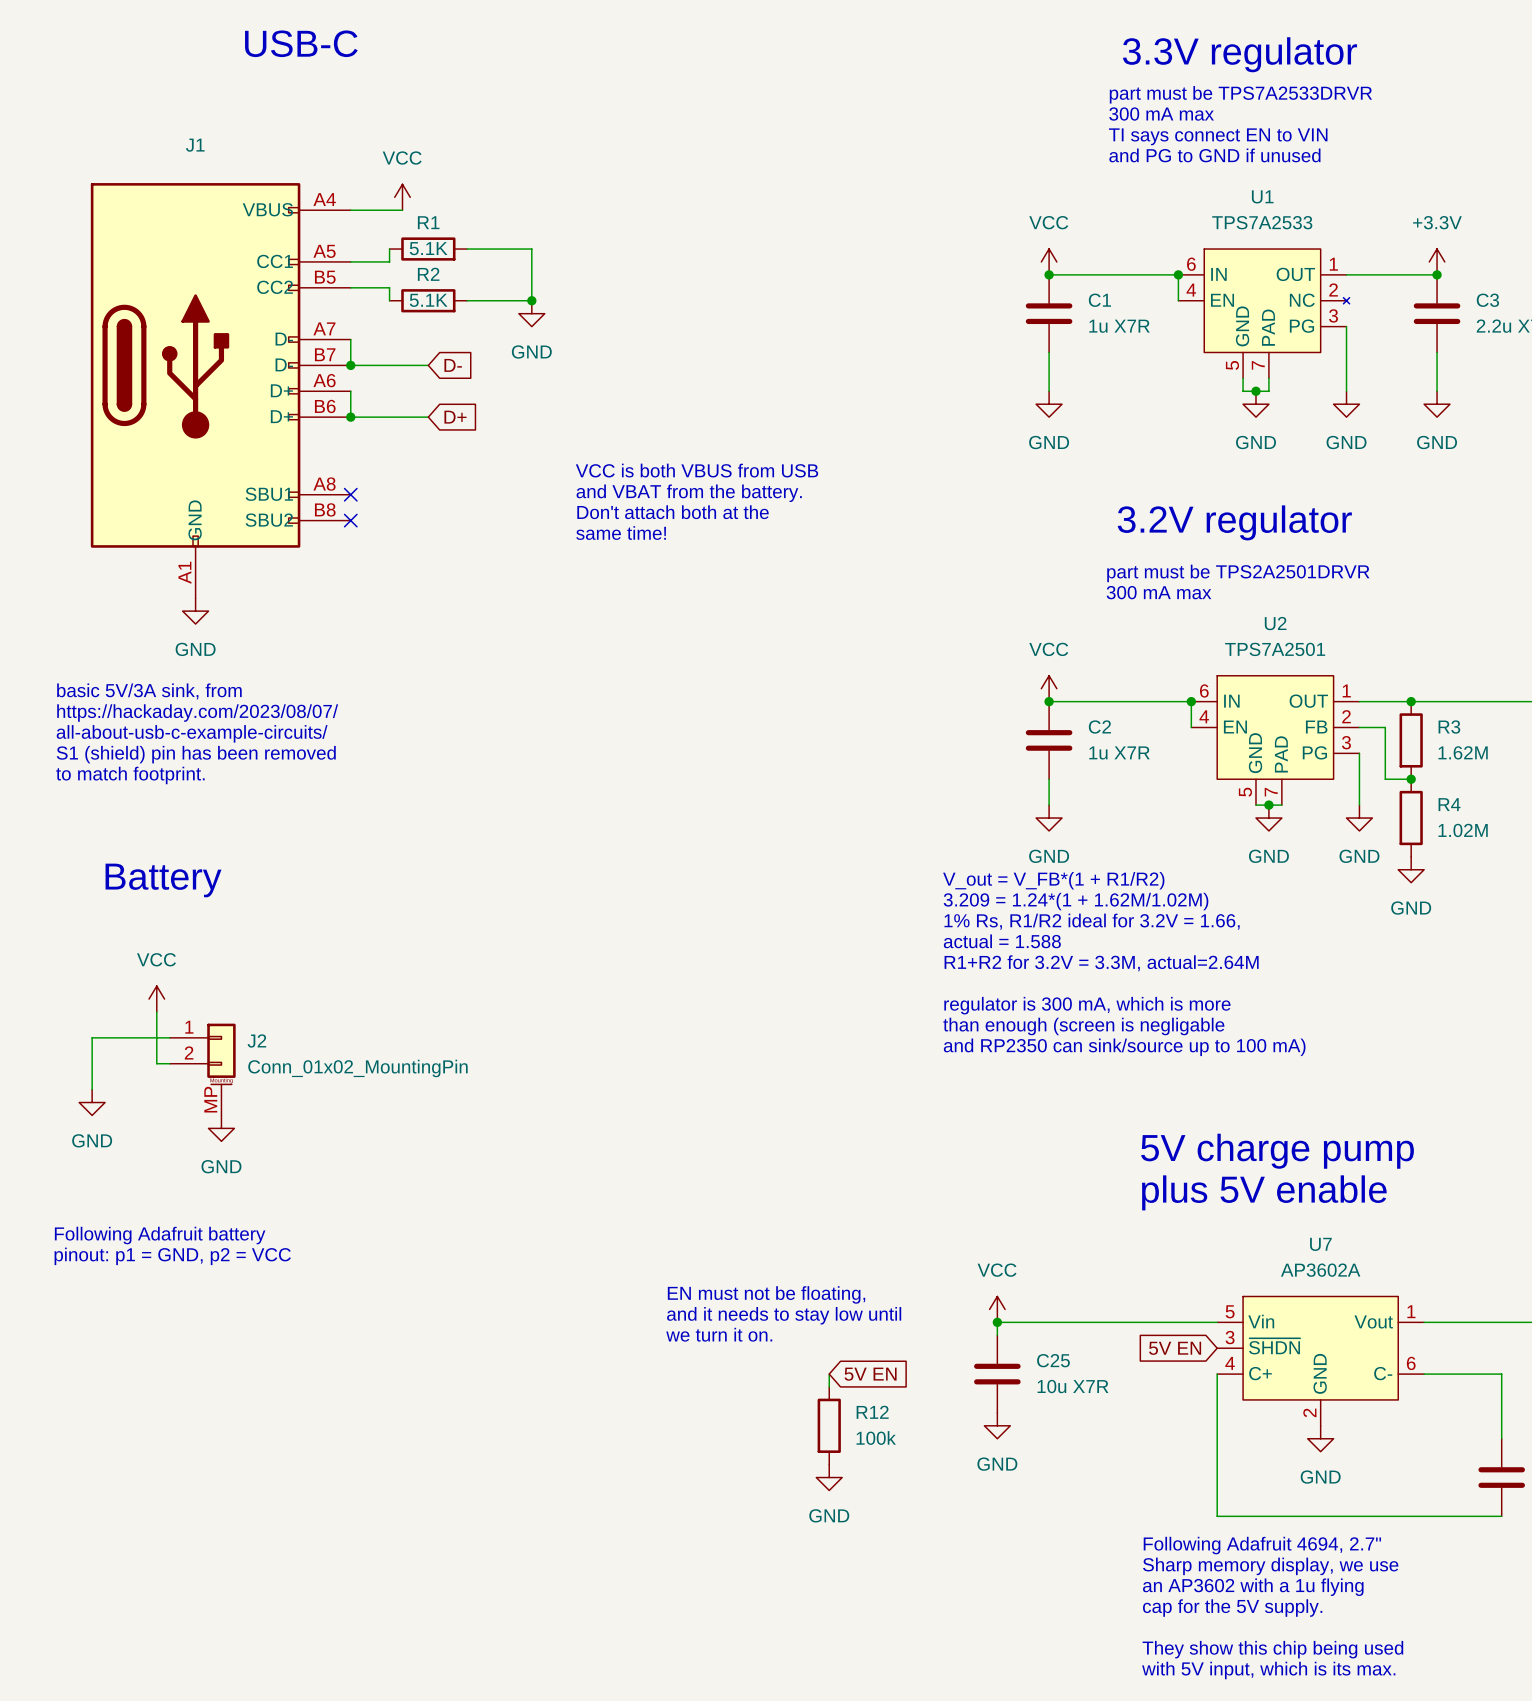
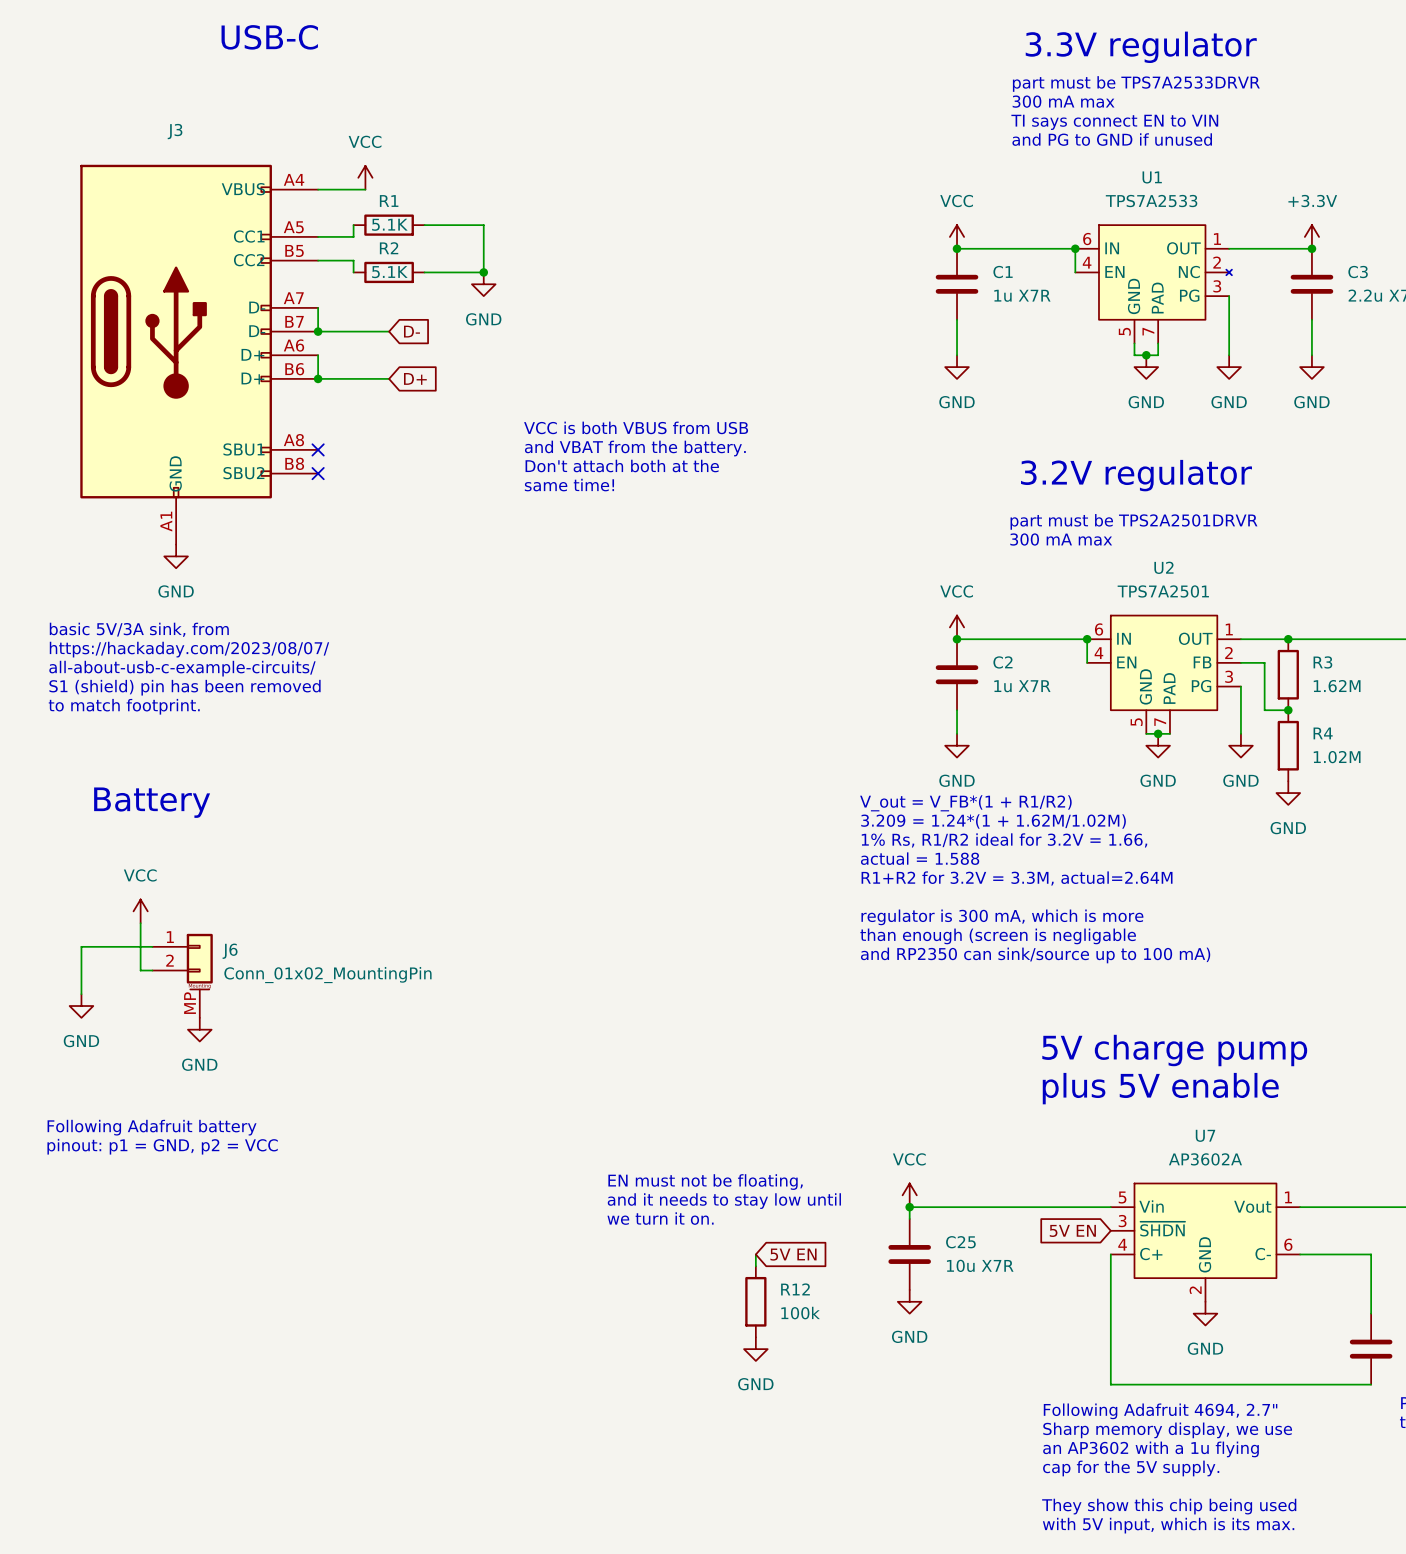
J1 name: J1 (195, 145) -> J3 (175, 131)
J2 name: J2 (256, 1040) -> J6 (230, 951)

